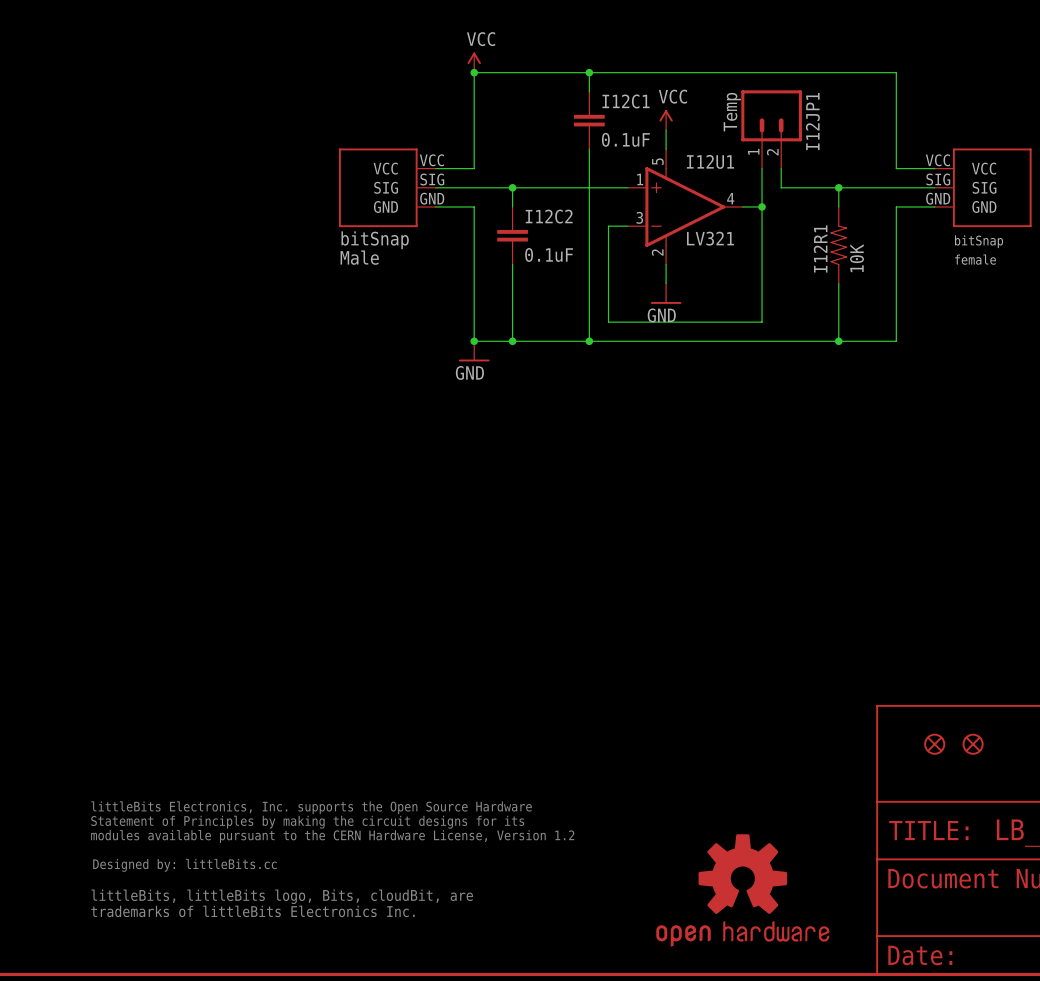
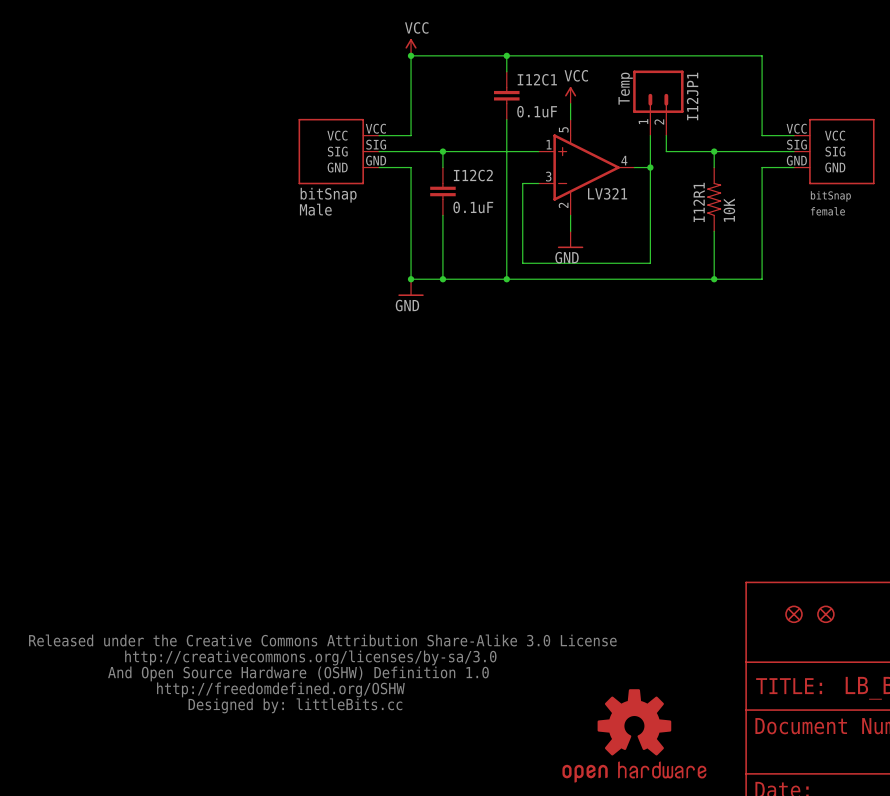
I12U1 name: I12U1 (710, 161) -> none
part: none -> (322, 673)
part: (332, 859) -> none

